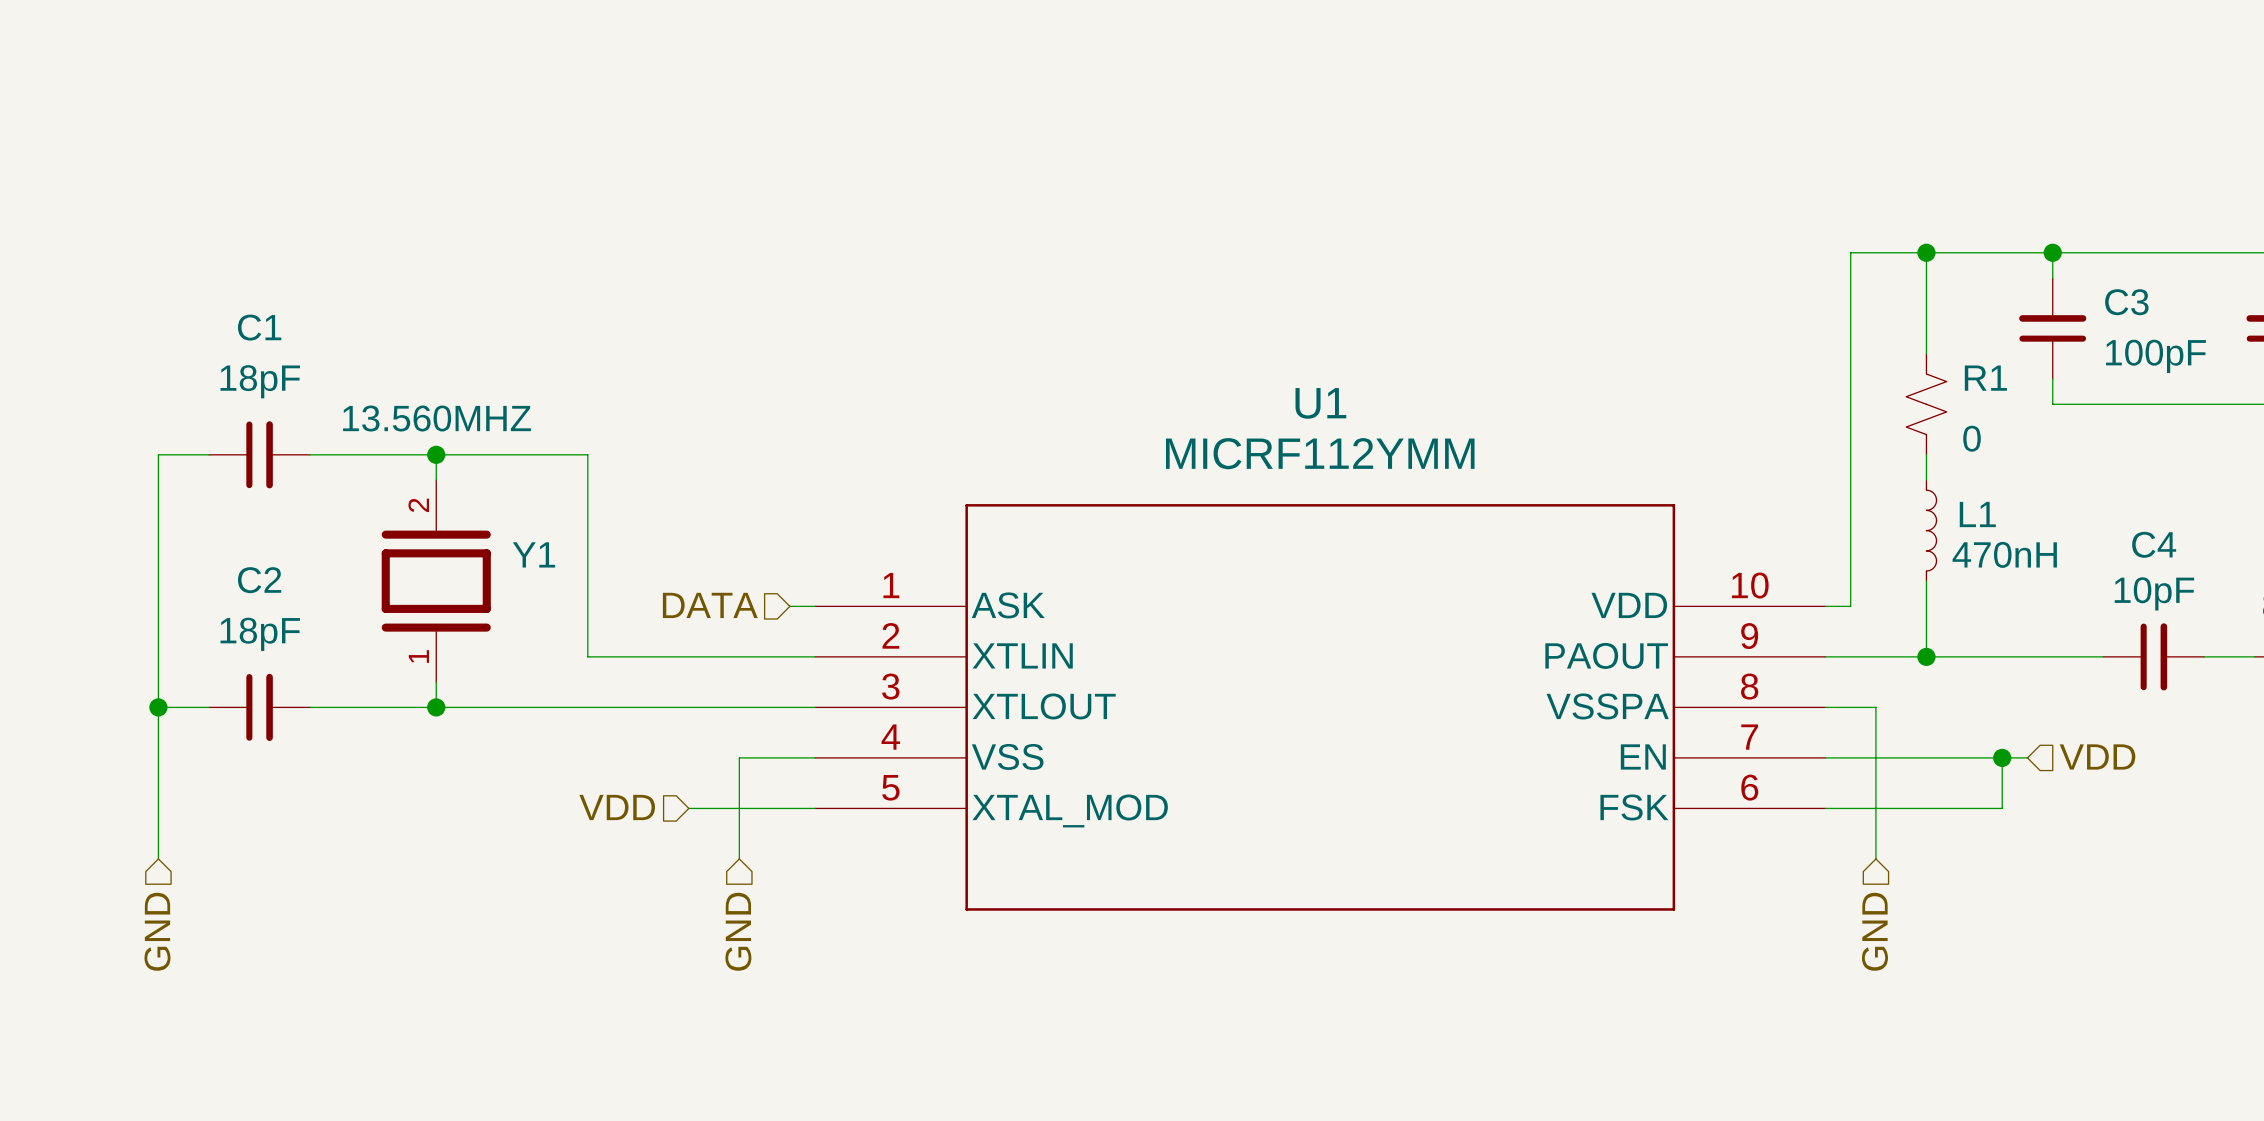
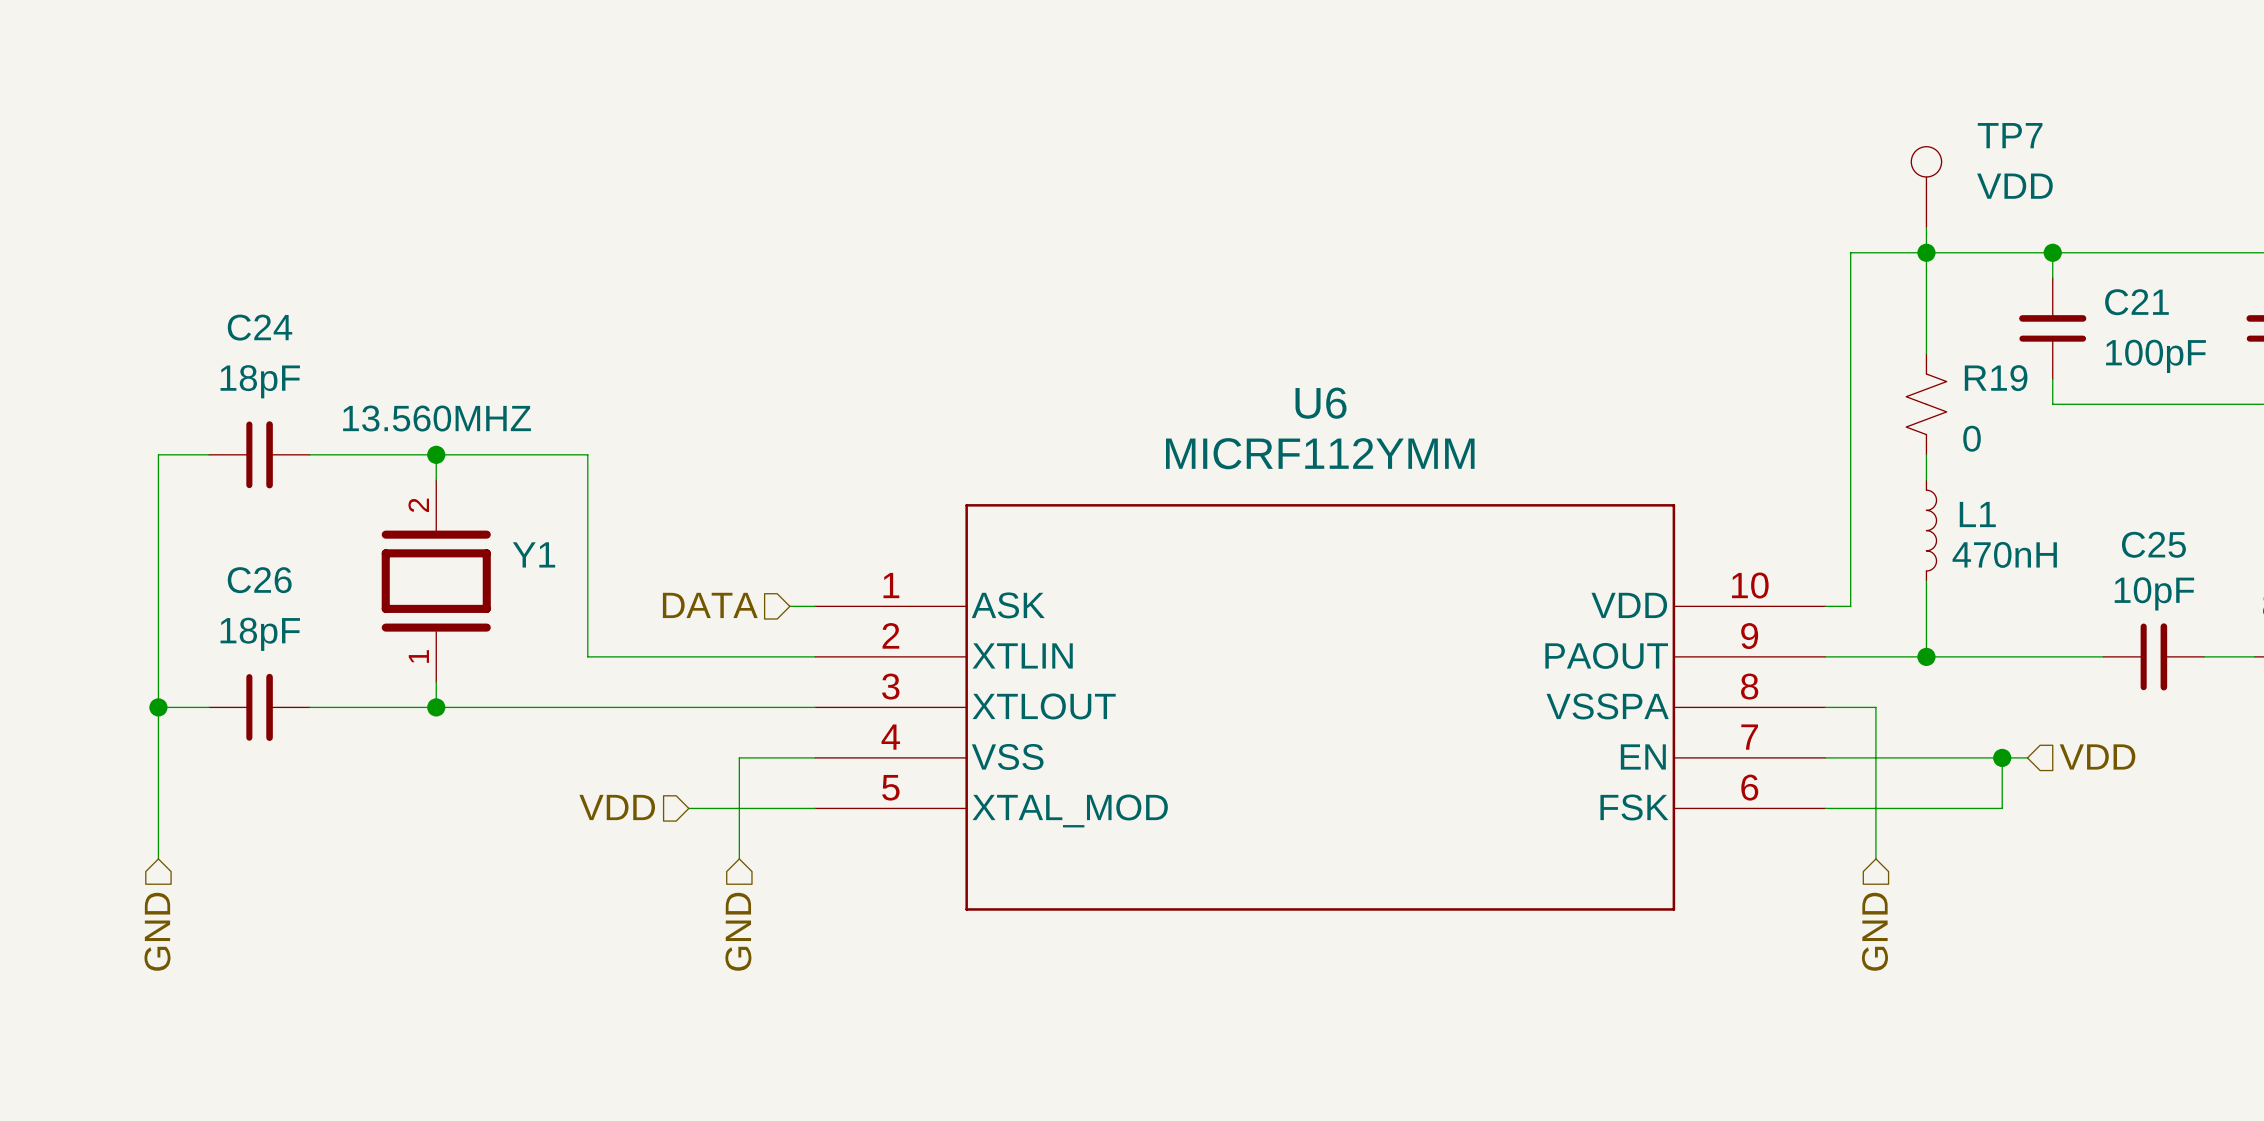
TP7: none -> VDD (1926, 187)
wire: none -> (1926, 227) (1926, 252)
C3 name: C3 (2126, 302) -> C21 (2136, 302)
C1 name: C1 (259, 327) -> C24 (259, 327)
R1 name: R1 (1985, 378) -> R19 (1996, 378)
U1 name: U1 (1320, 403) -> U6 (1321, 403)
C4 name: C4 (2154, 544) -> C25 (2153, 544)
C2 name: C2 (259, 580) -> C26 (259, 580)

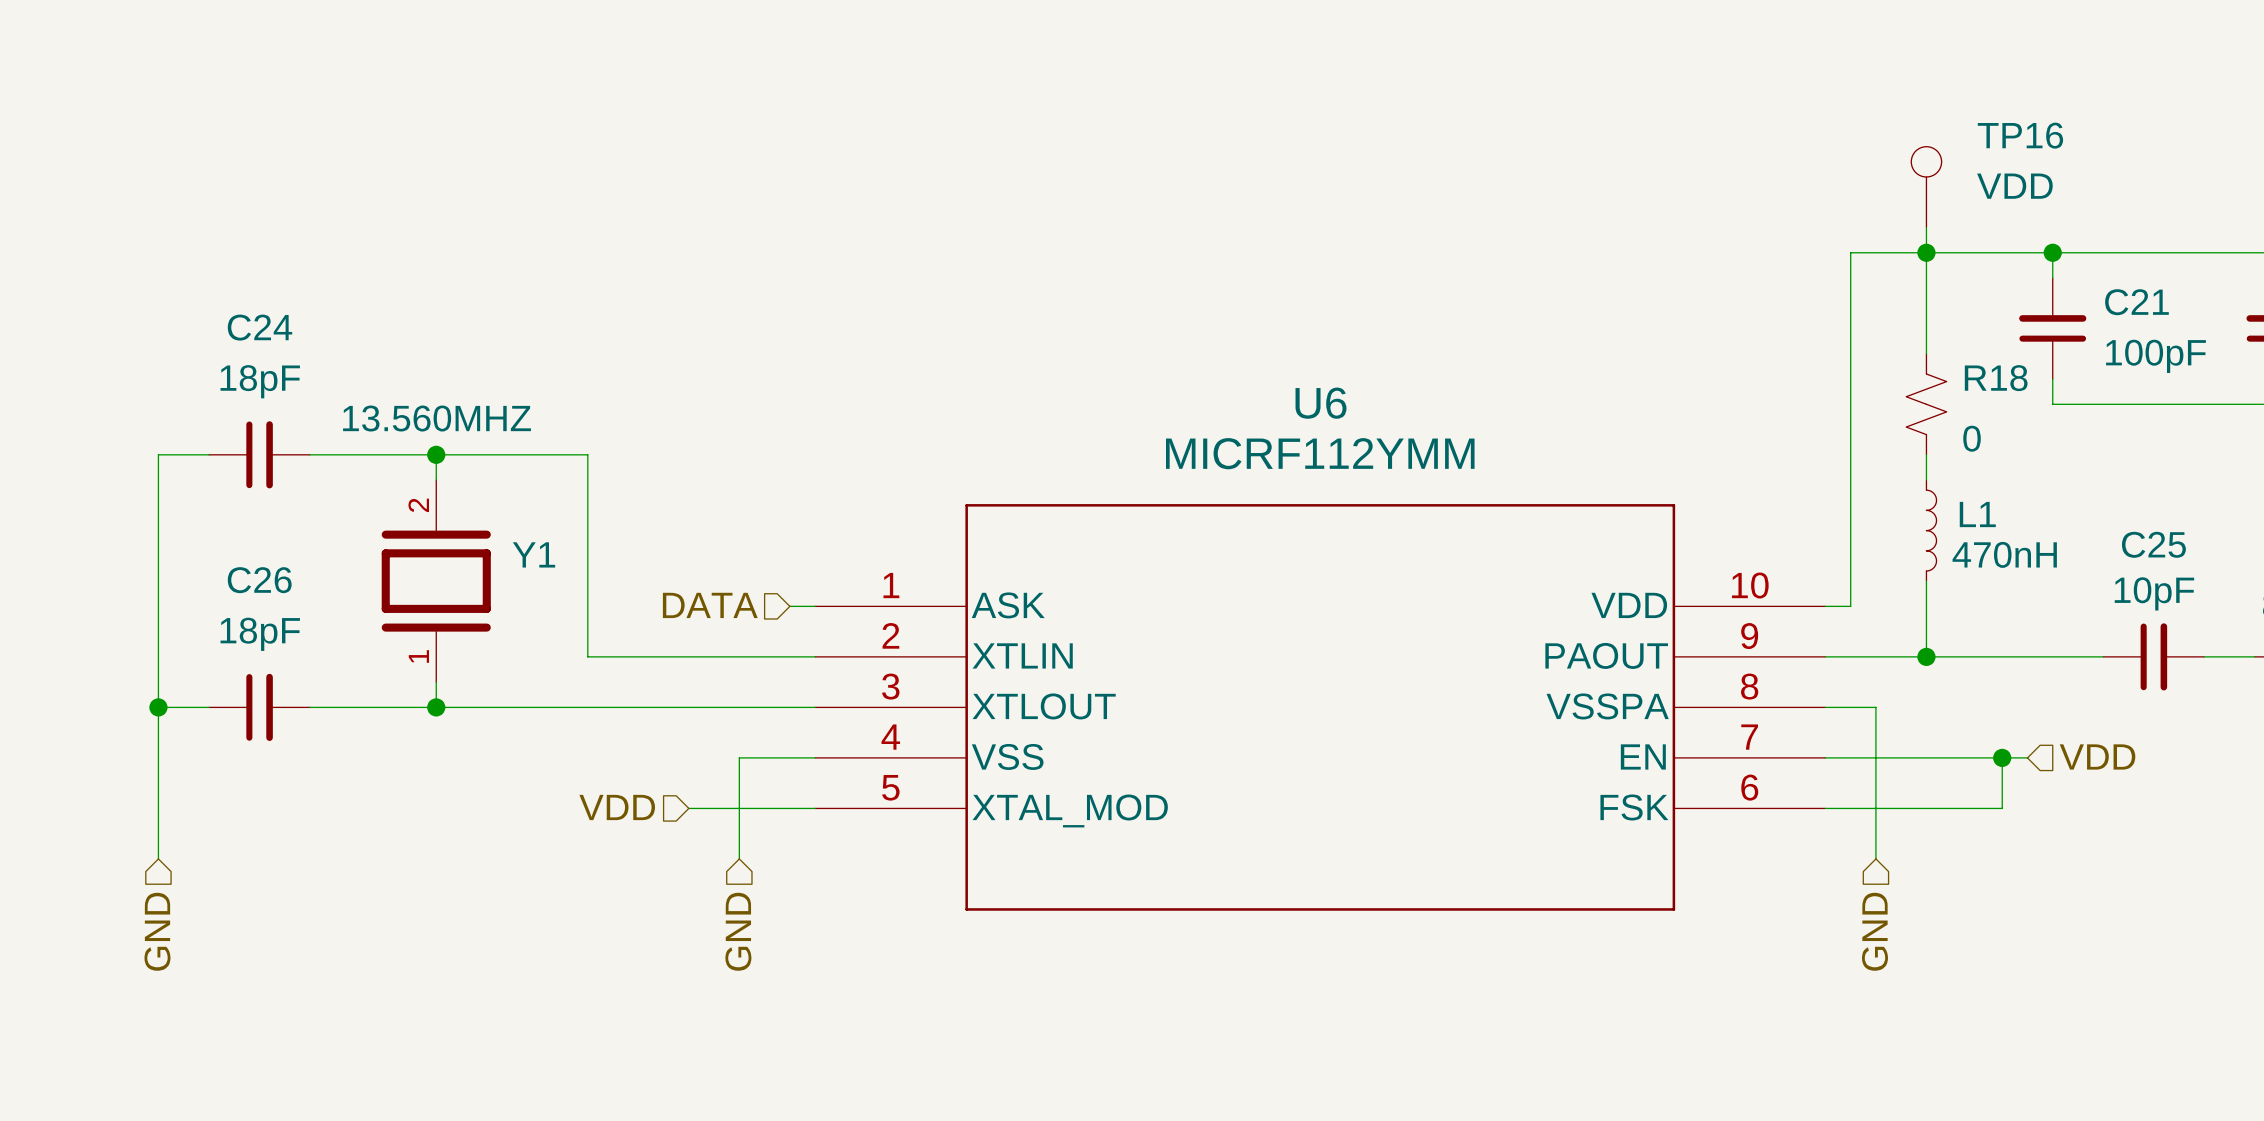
TP7 name: TP7 (2010, 135) -> TP16 (2020, 135)
R19 name: R19 (1996, 378) -> R18 (1996, 378)

